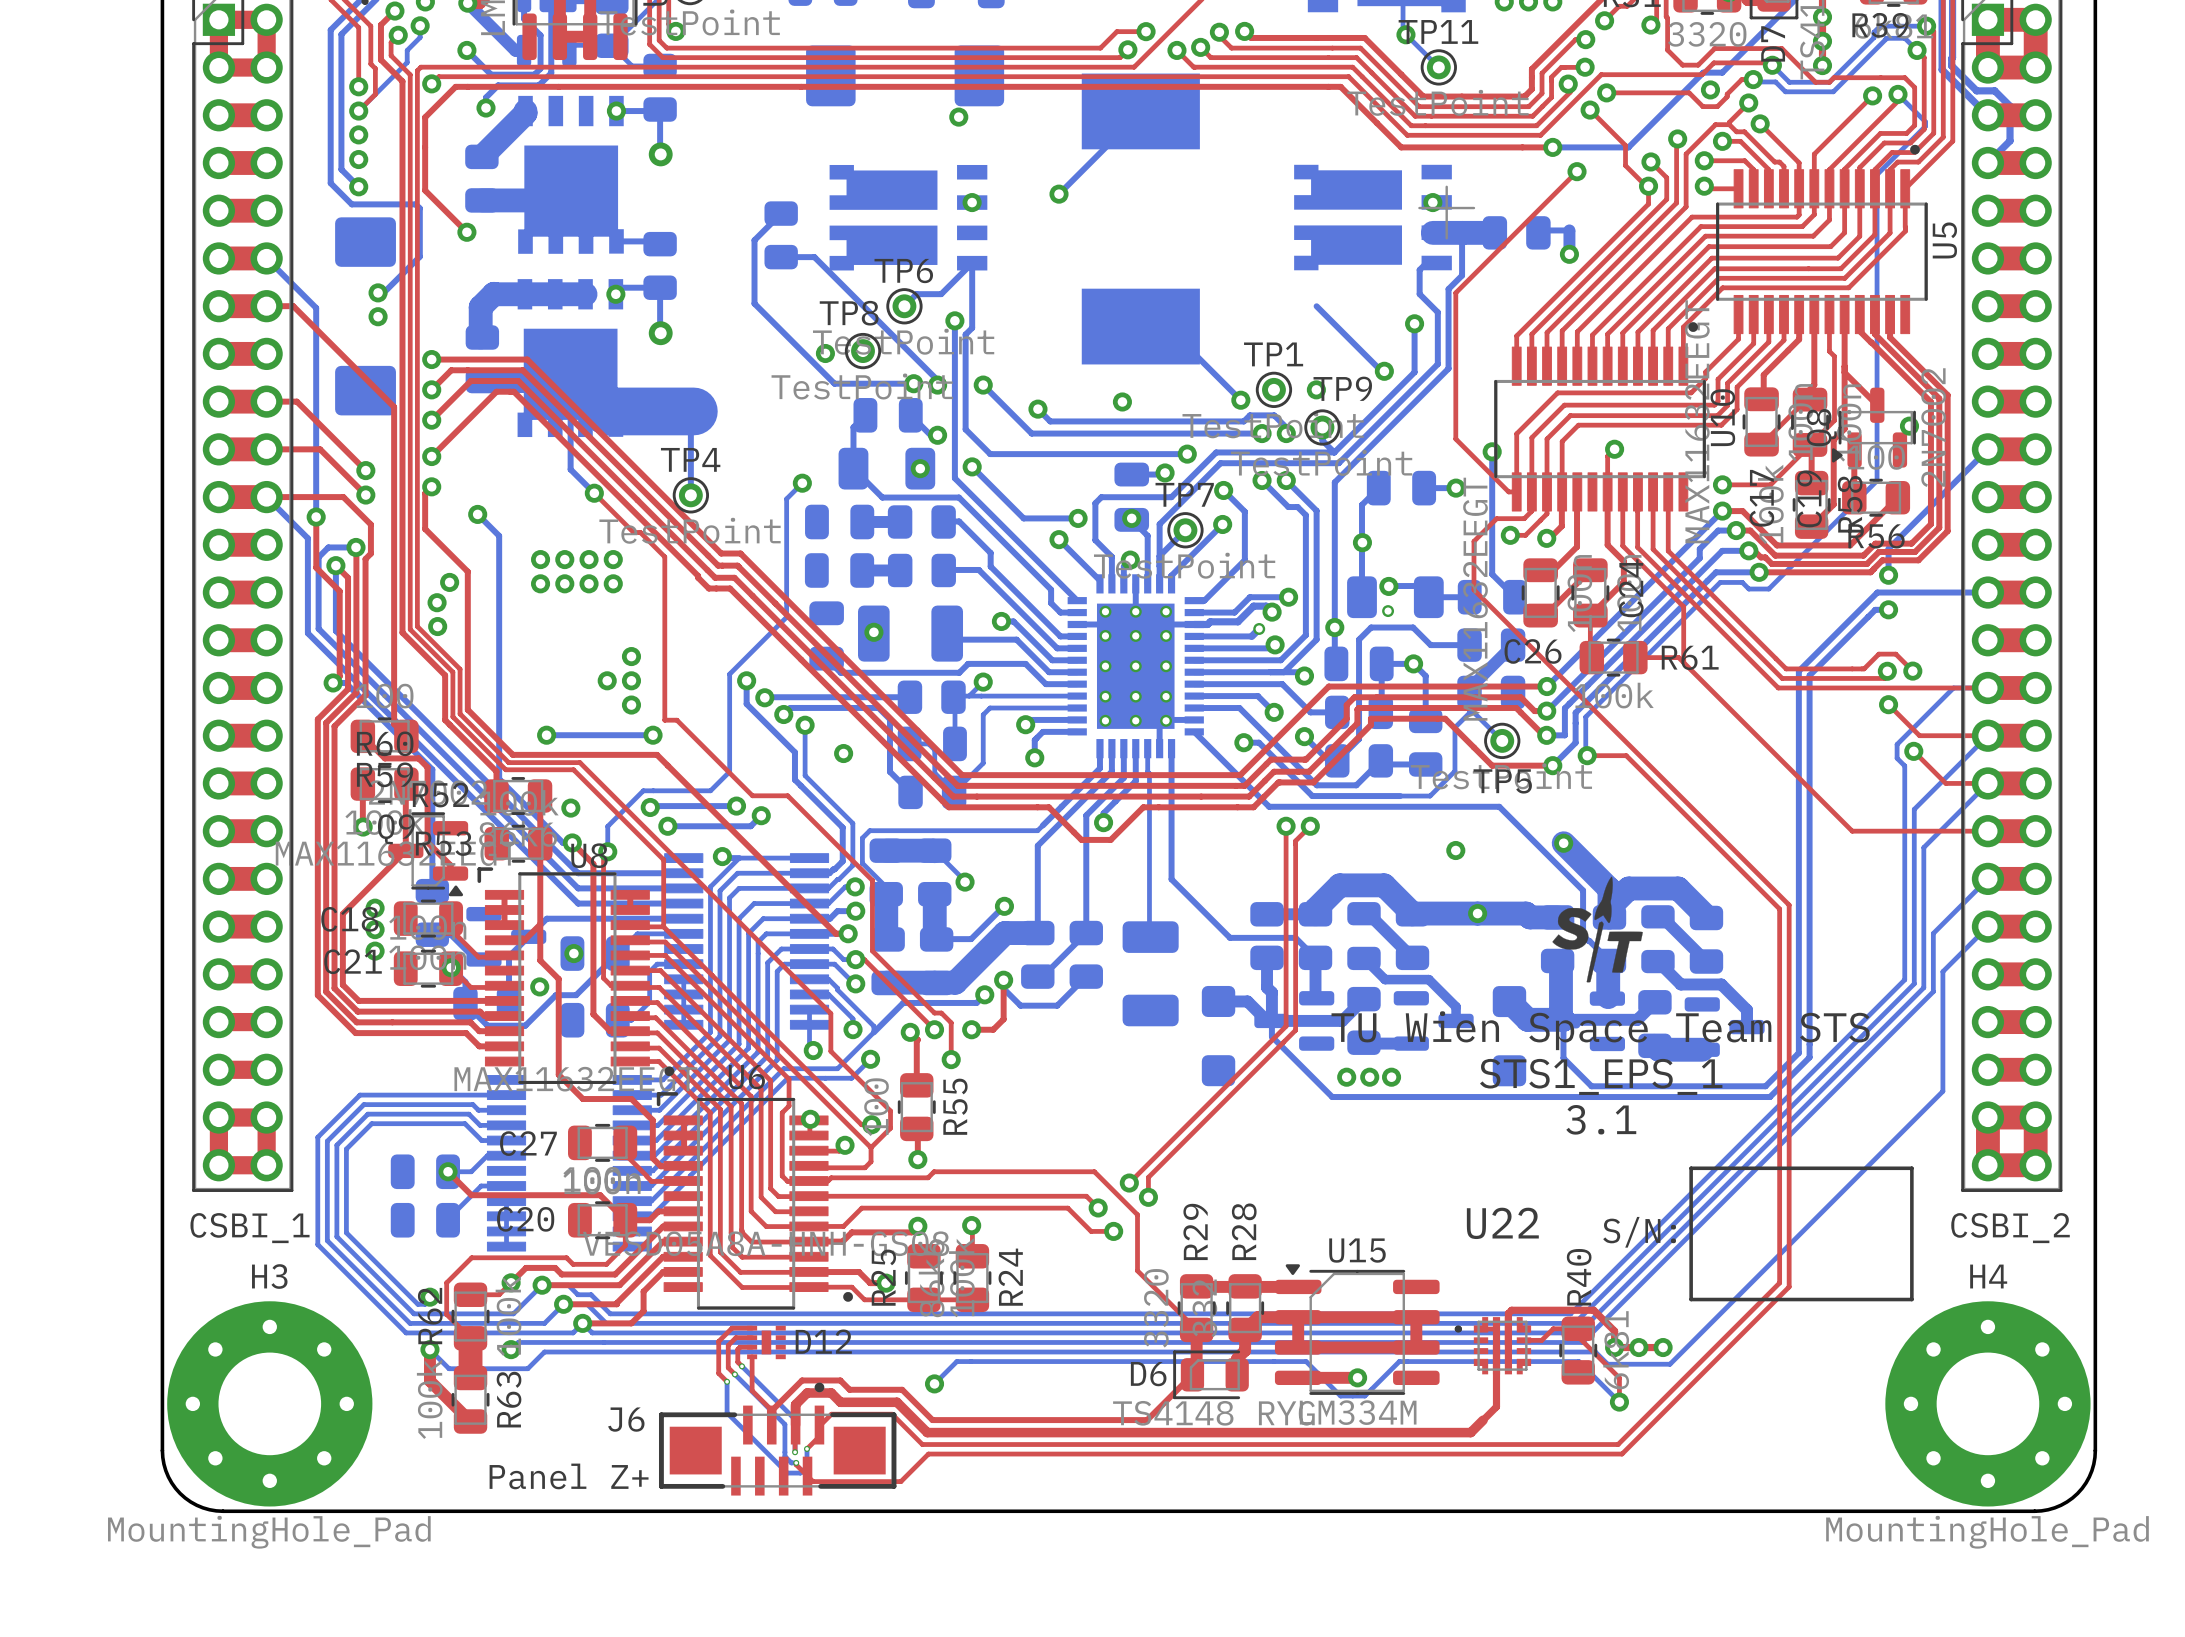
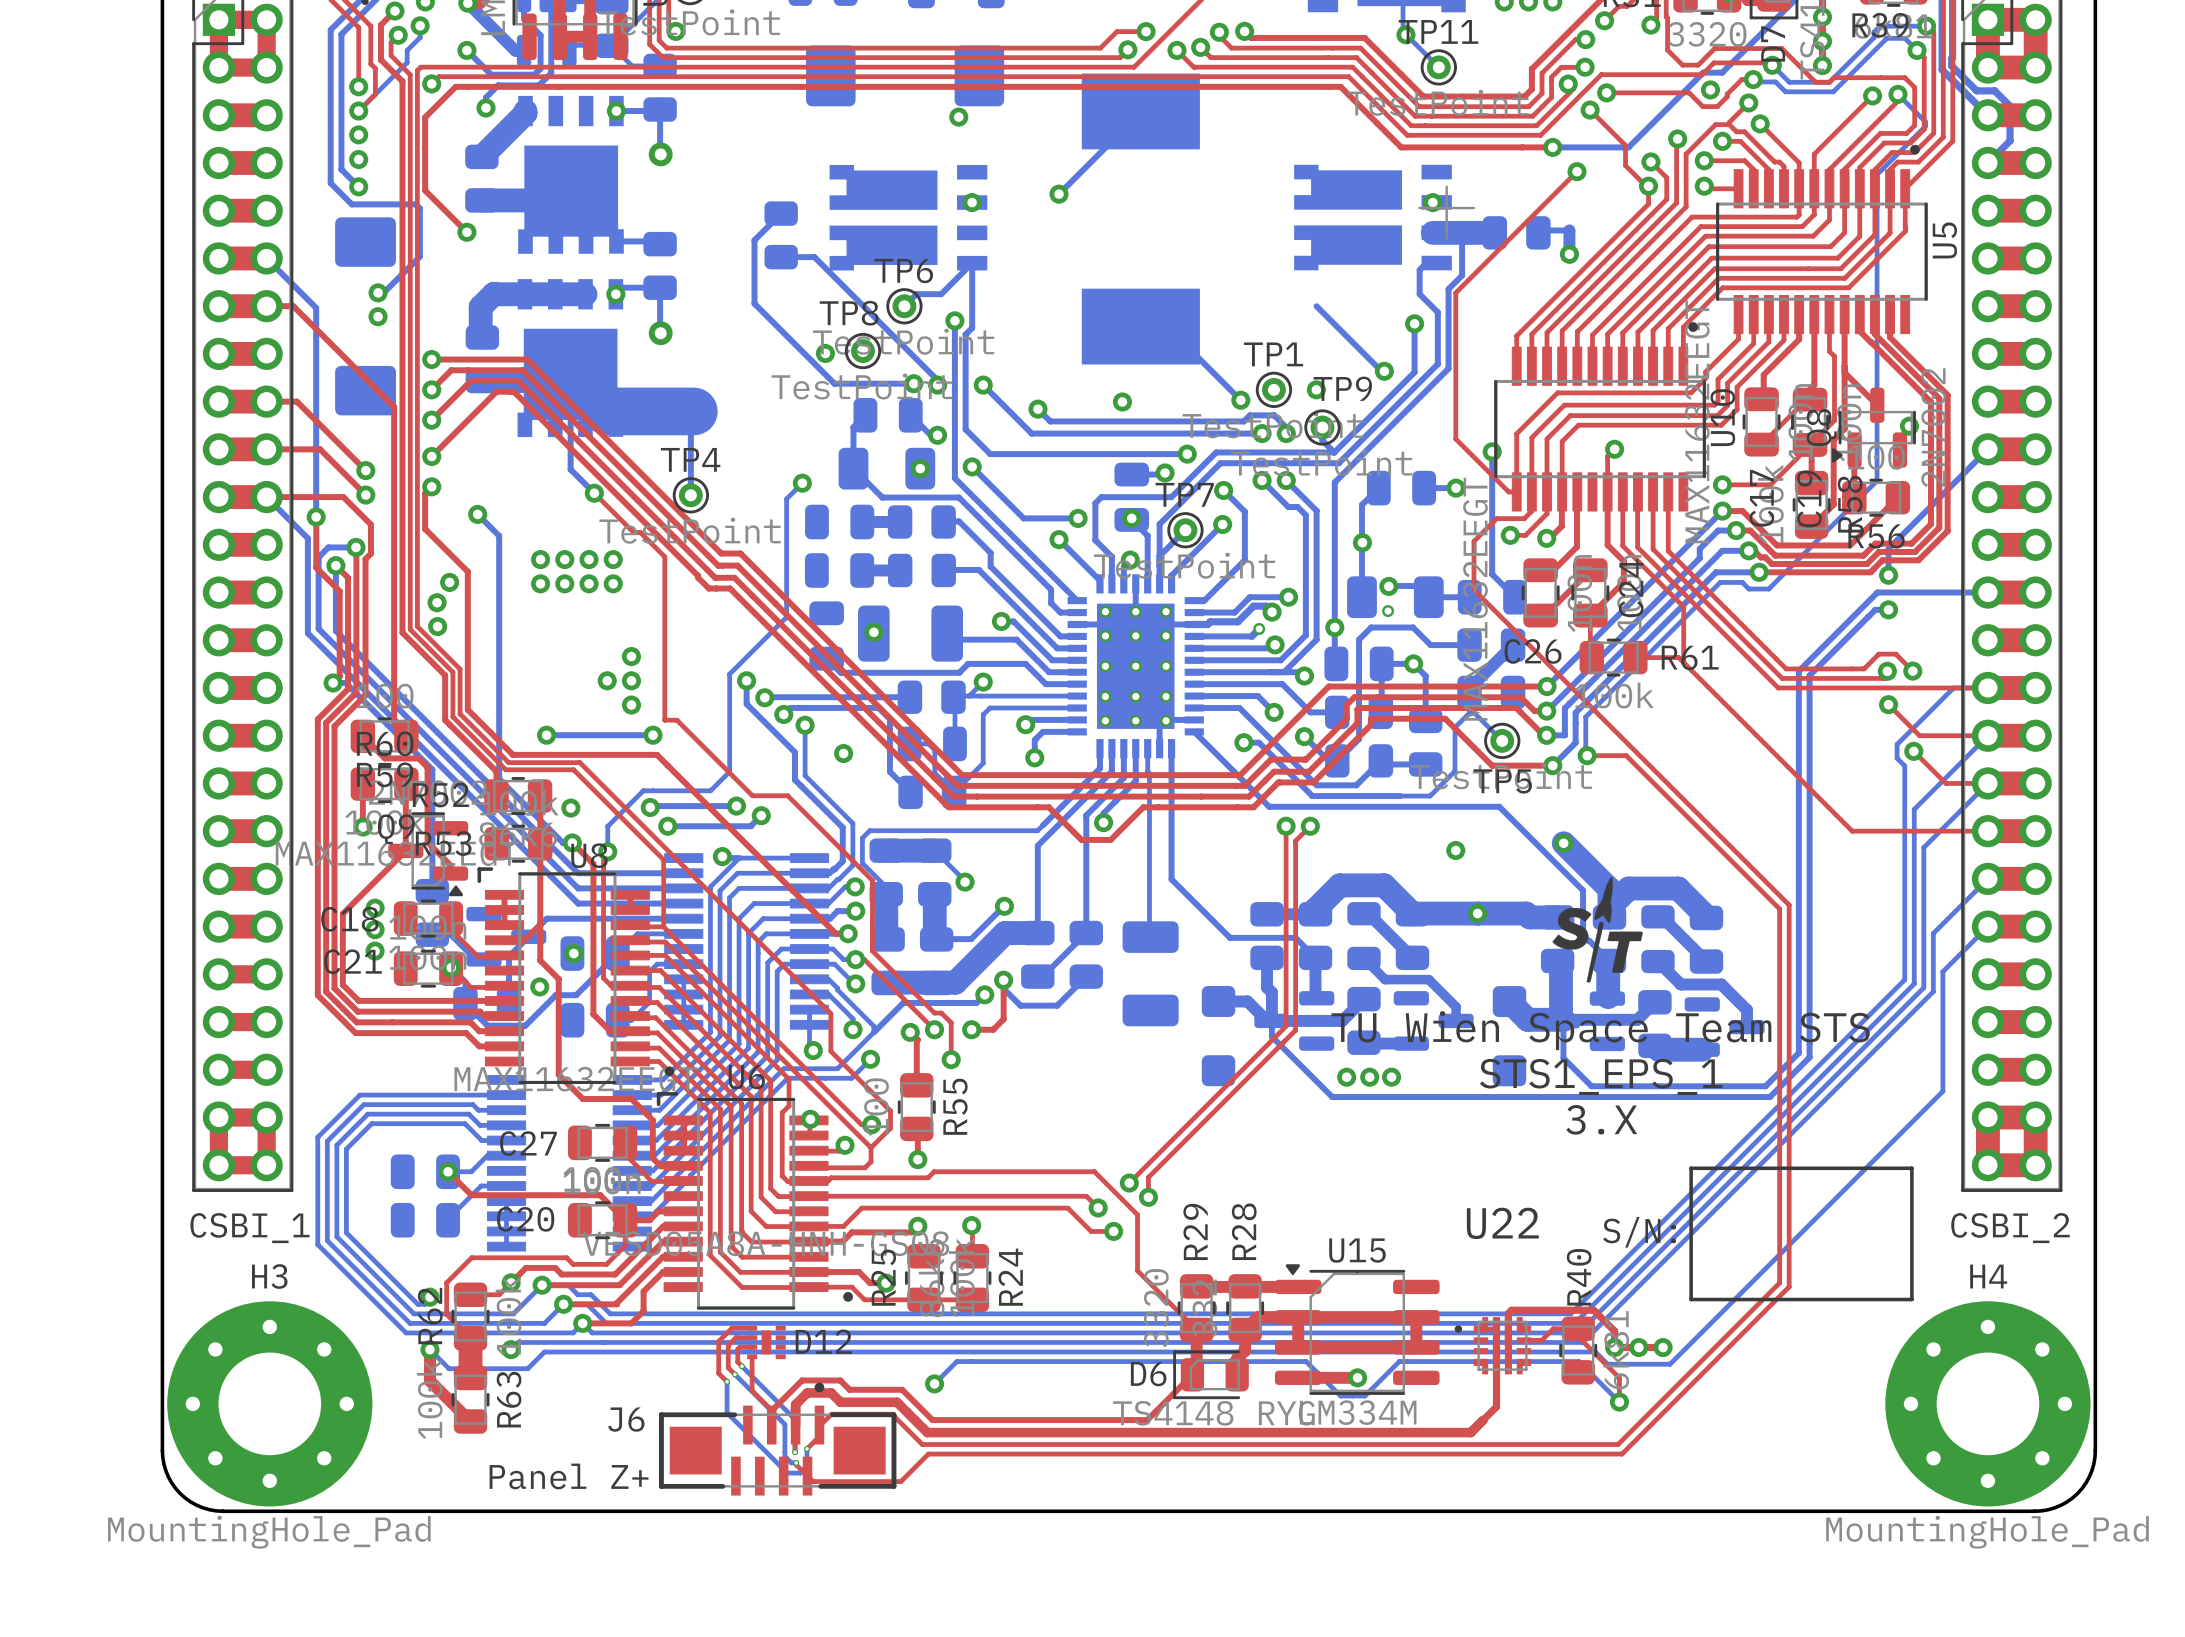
text: 3.1 (1601, 1119) -> 3.X (1601, 1119)

